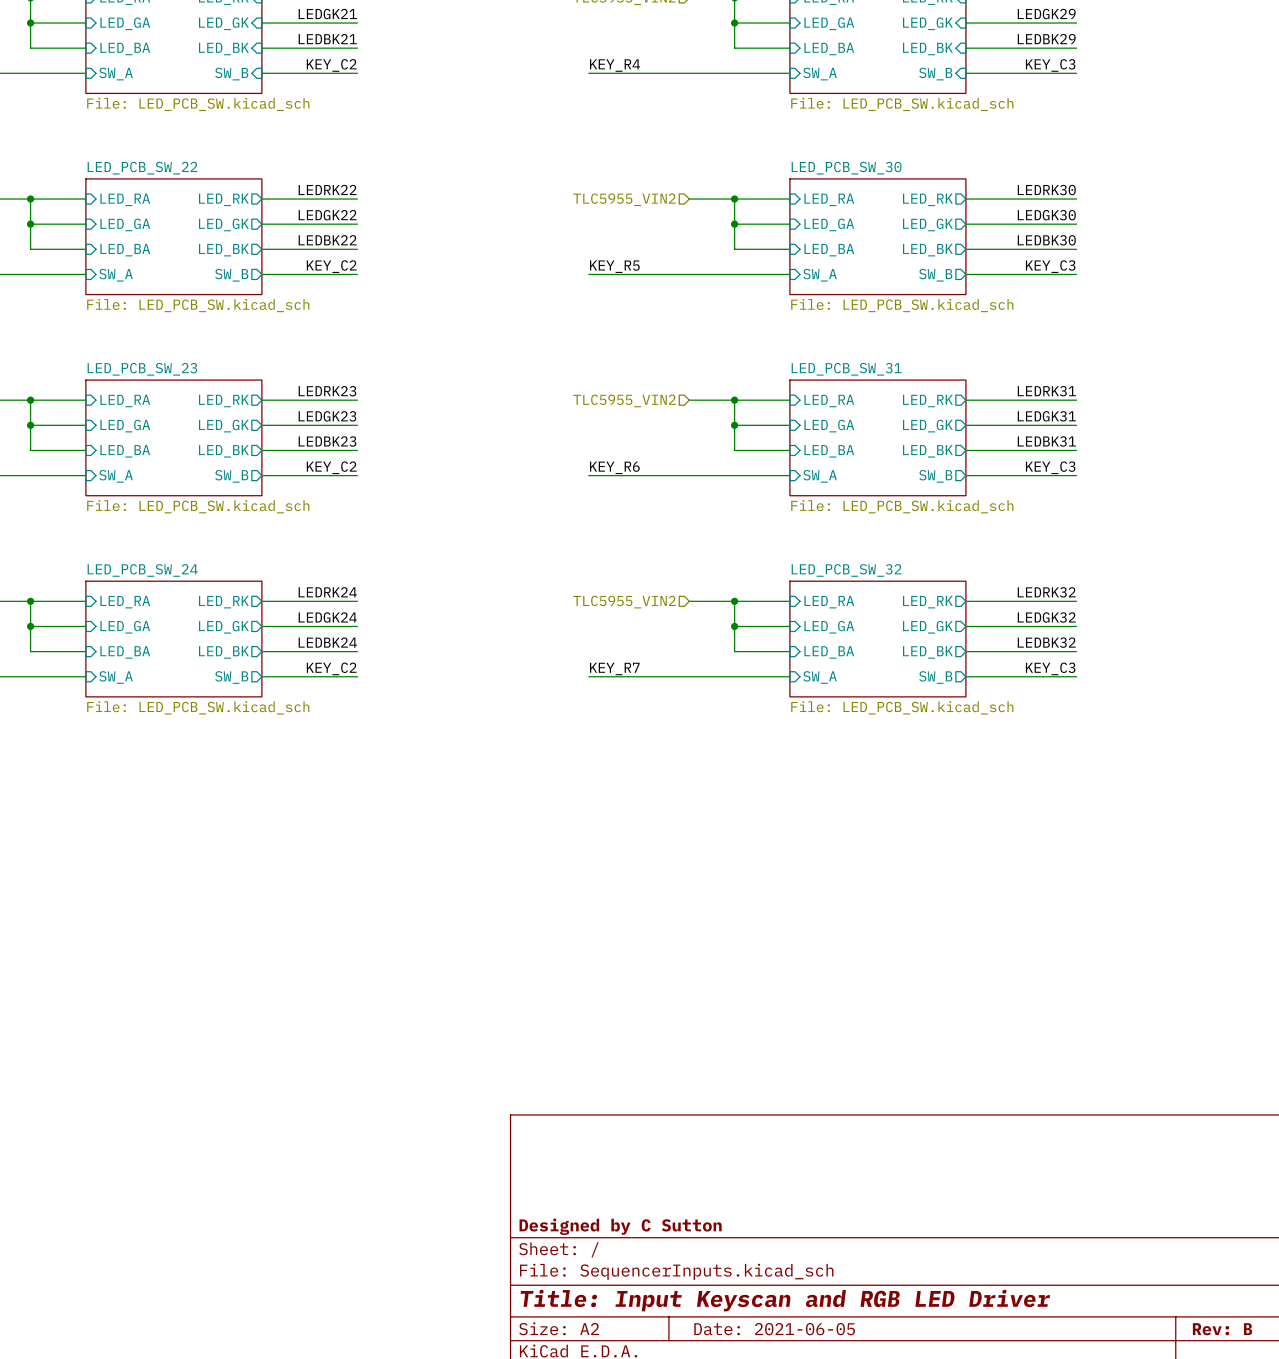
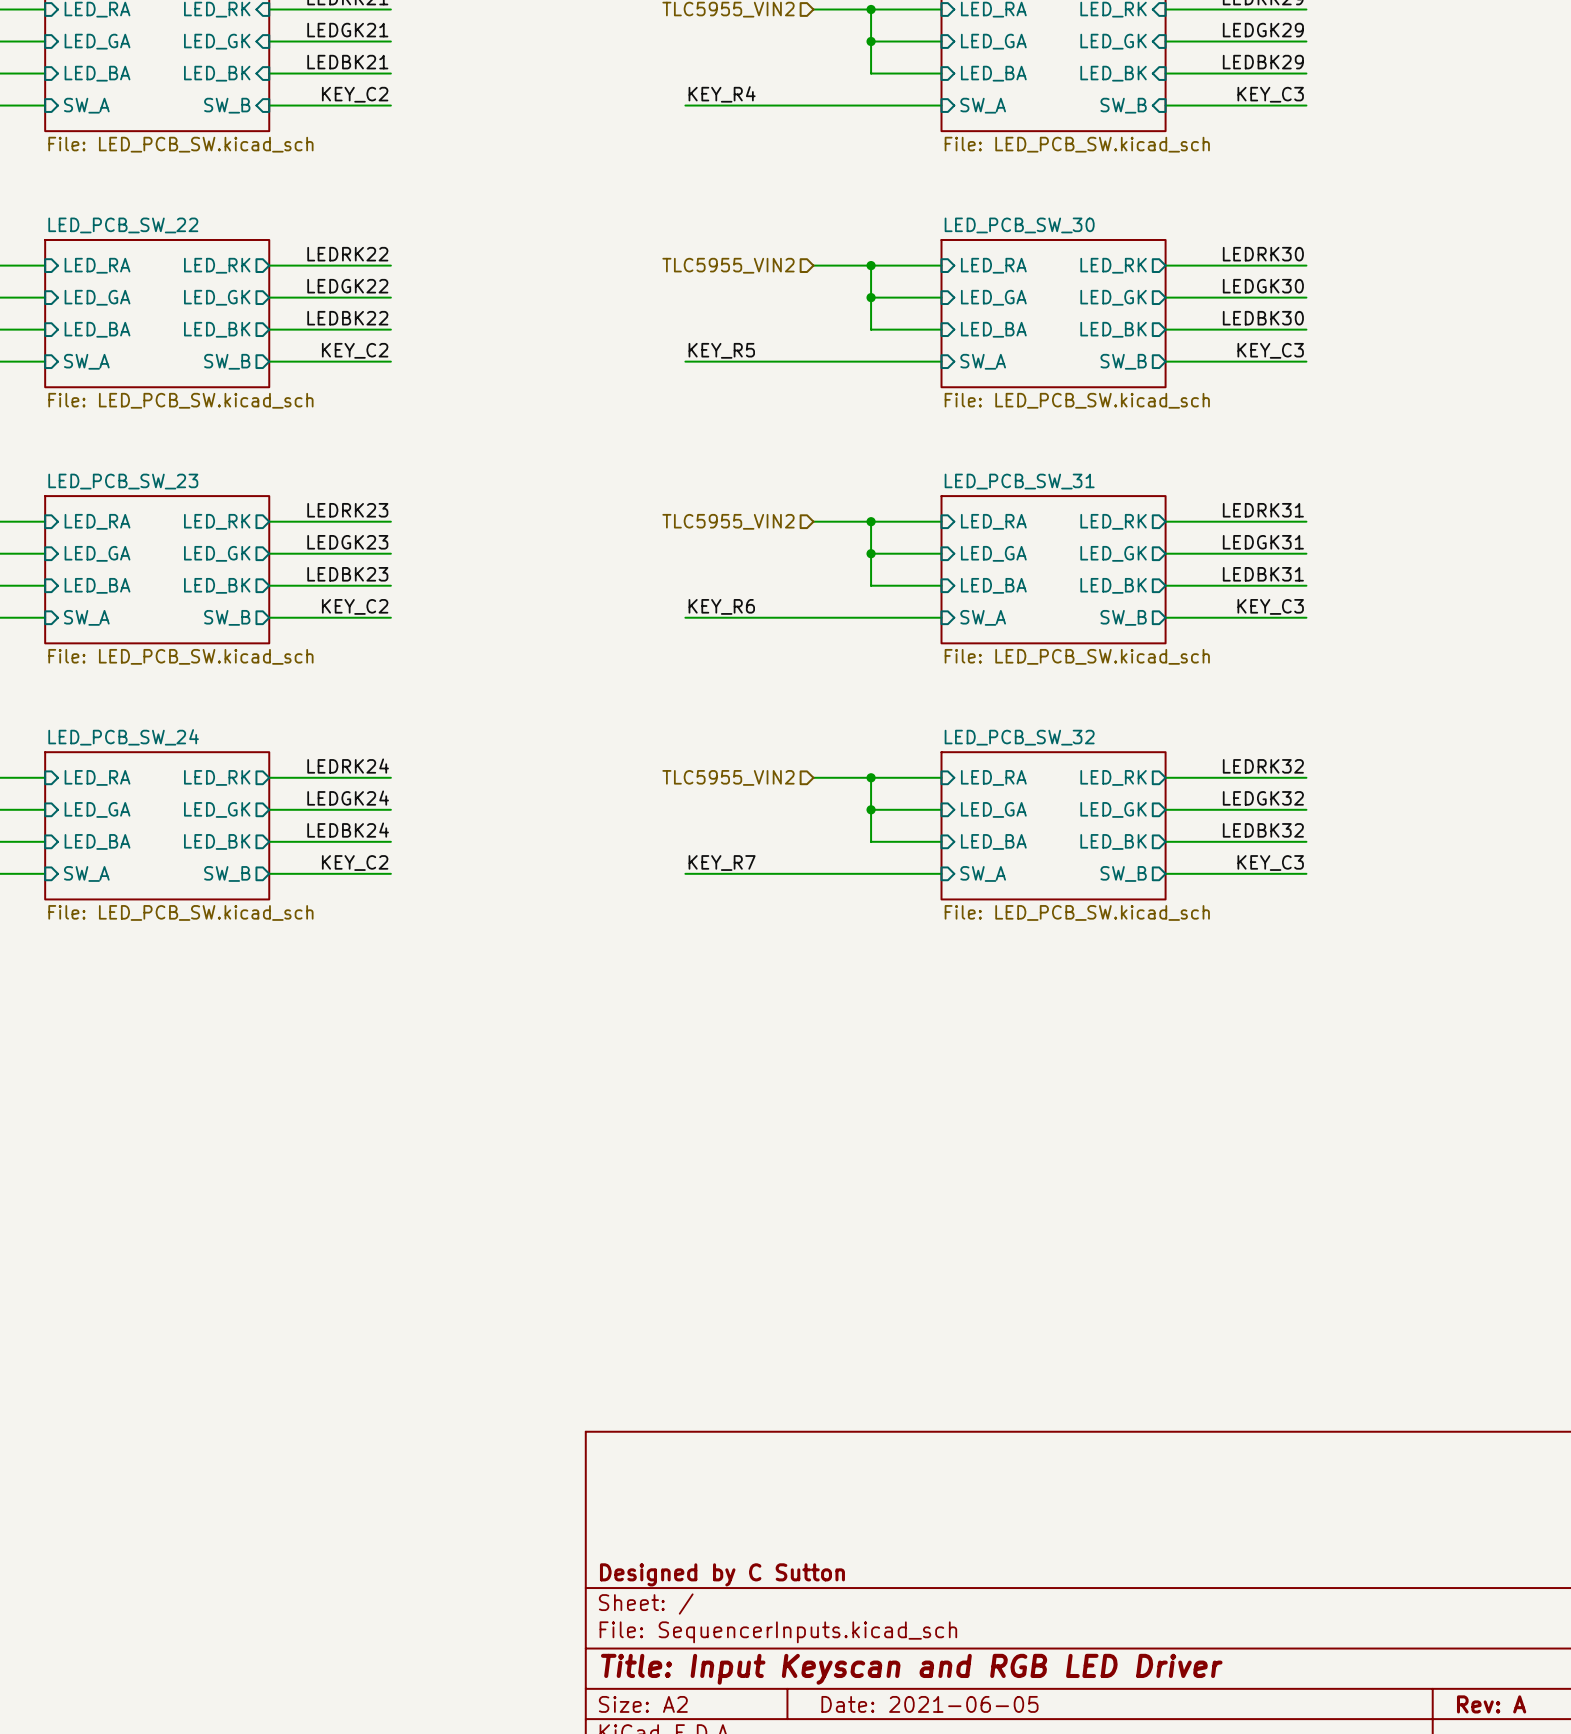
title block: Rev: B (1222, 1329) -> Rev: A (1491, 1704)

